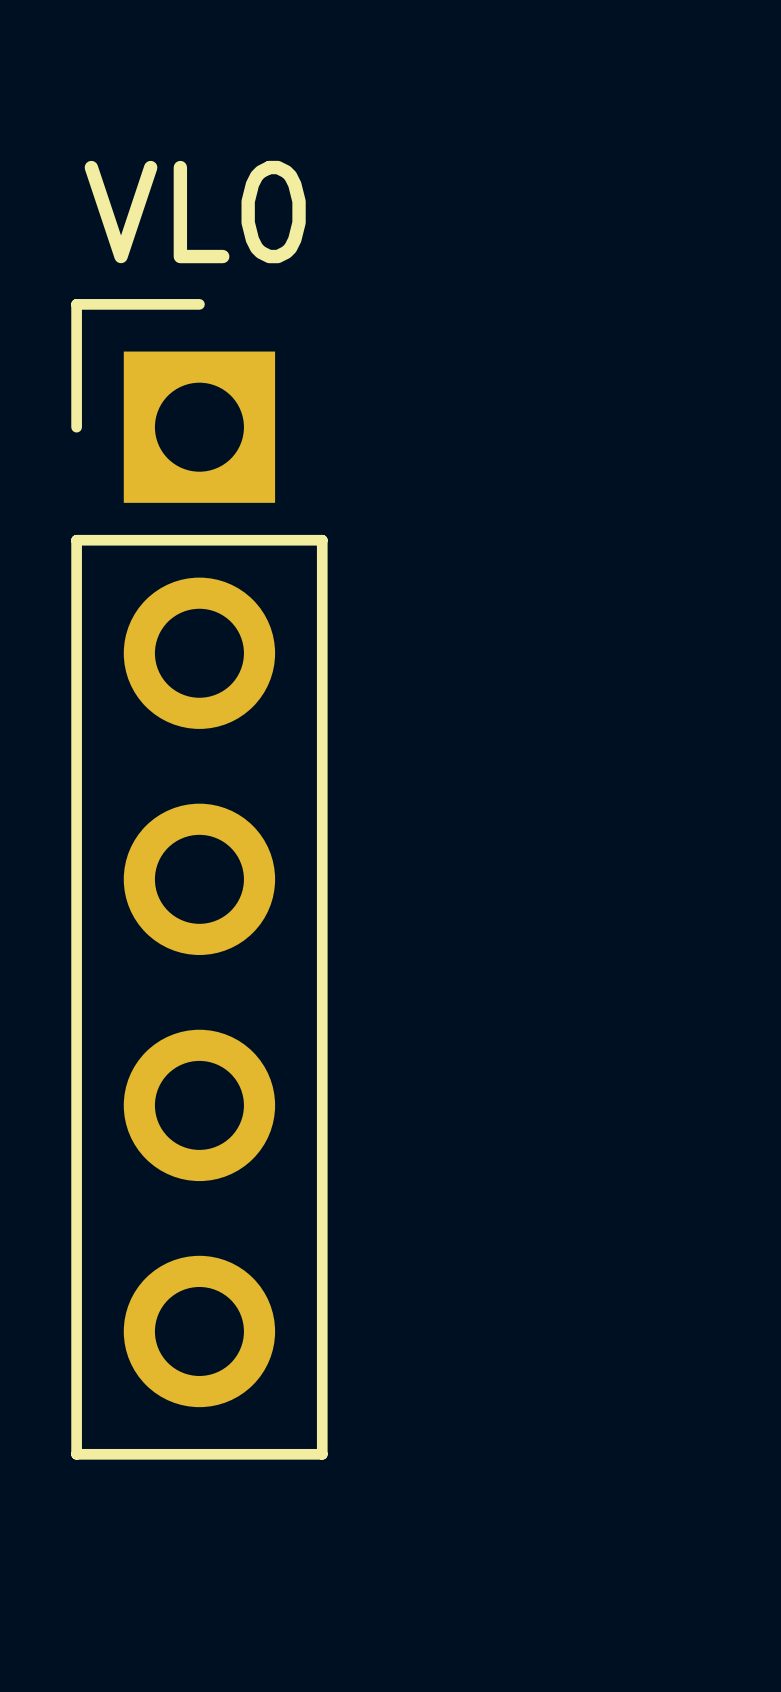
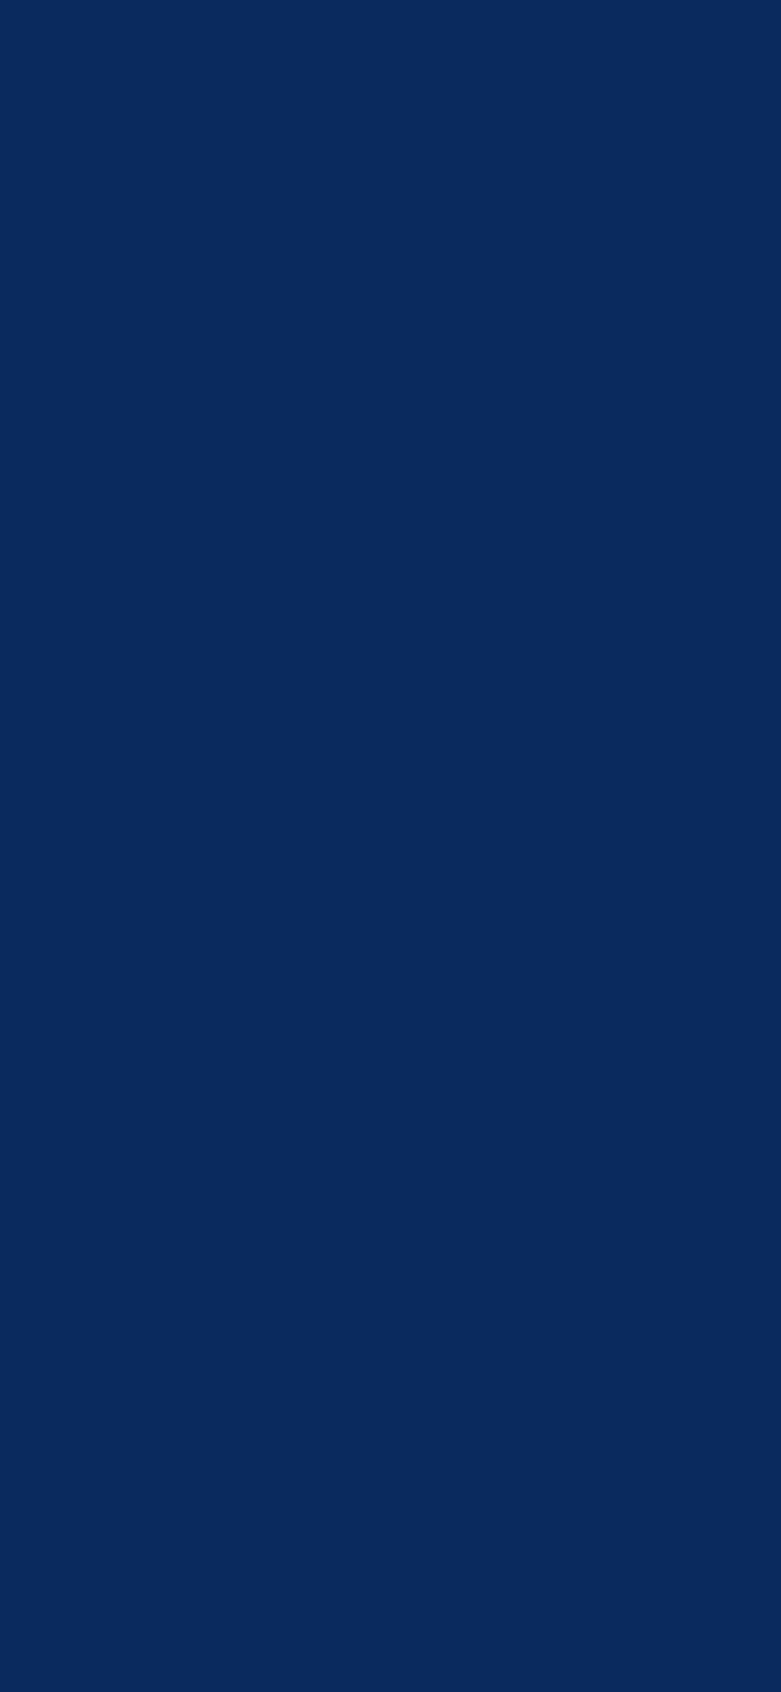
VL0: (199, 879) -> none

